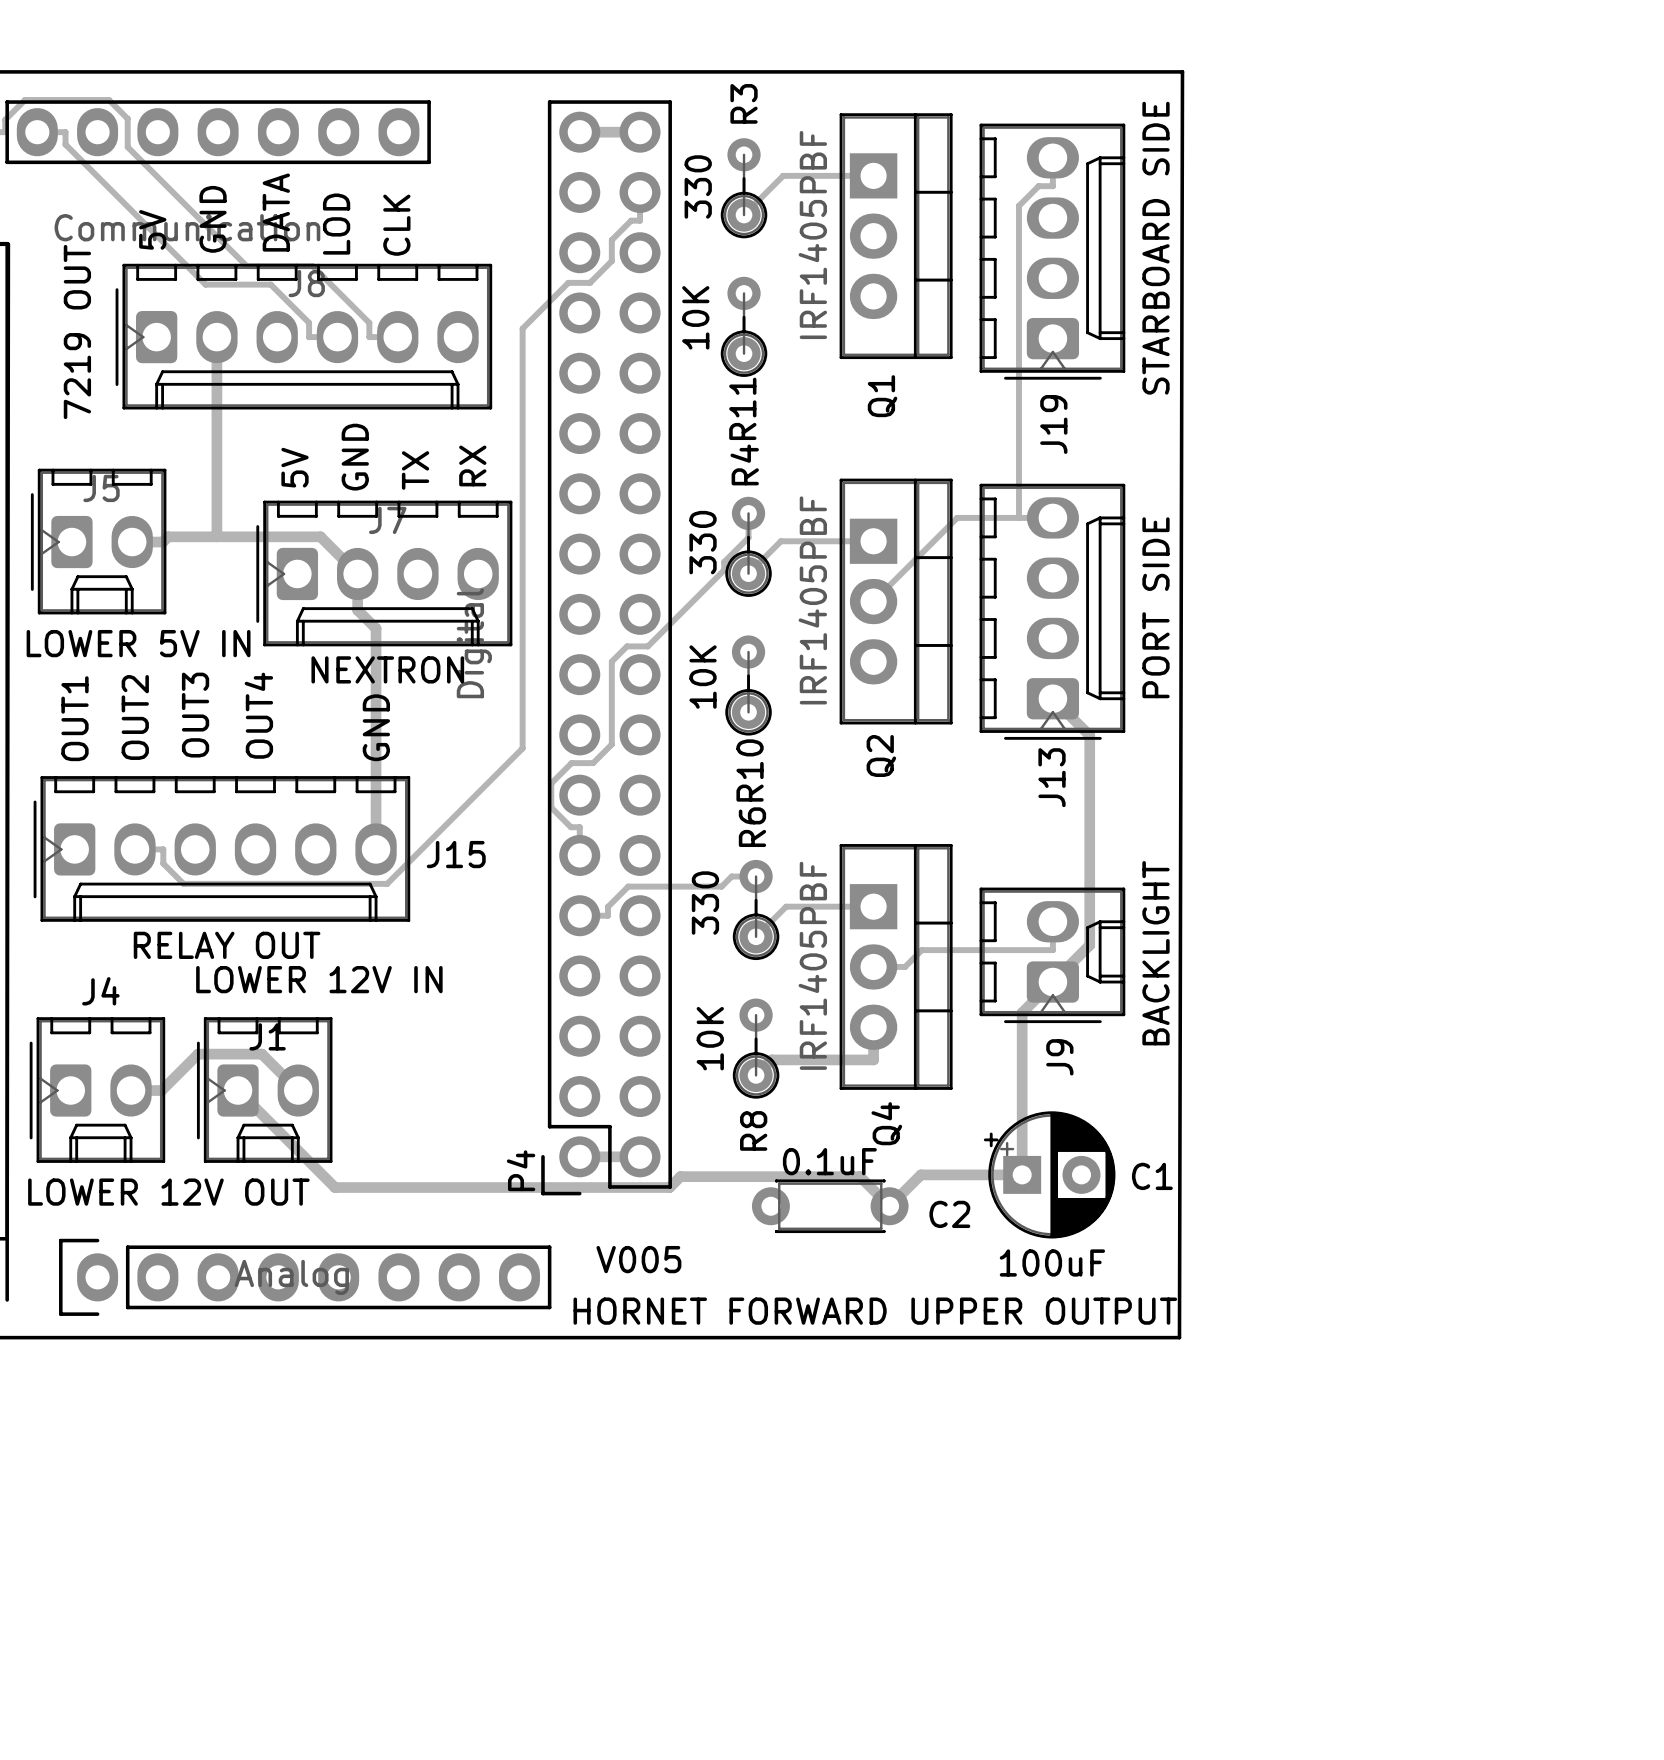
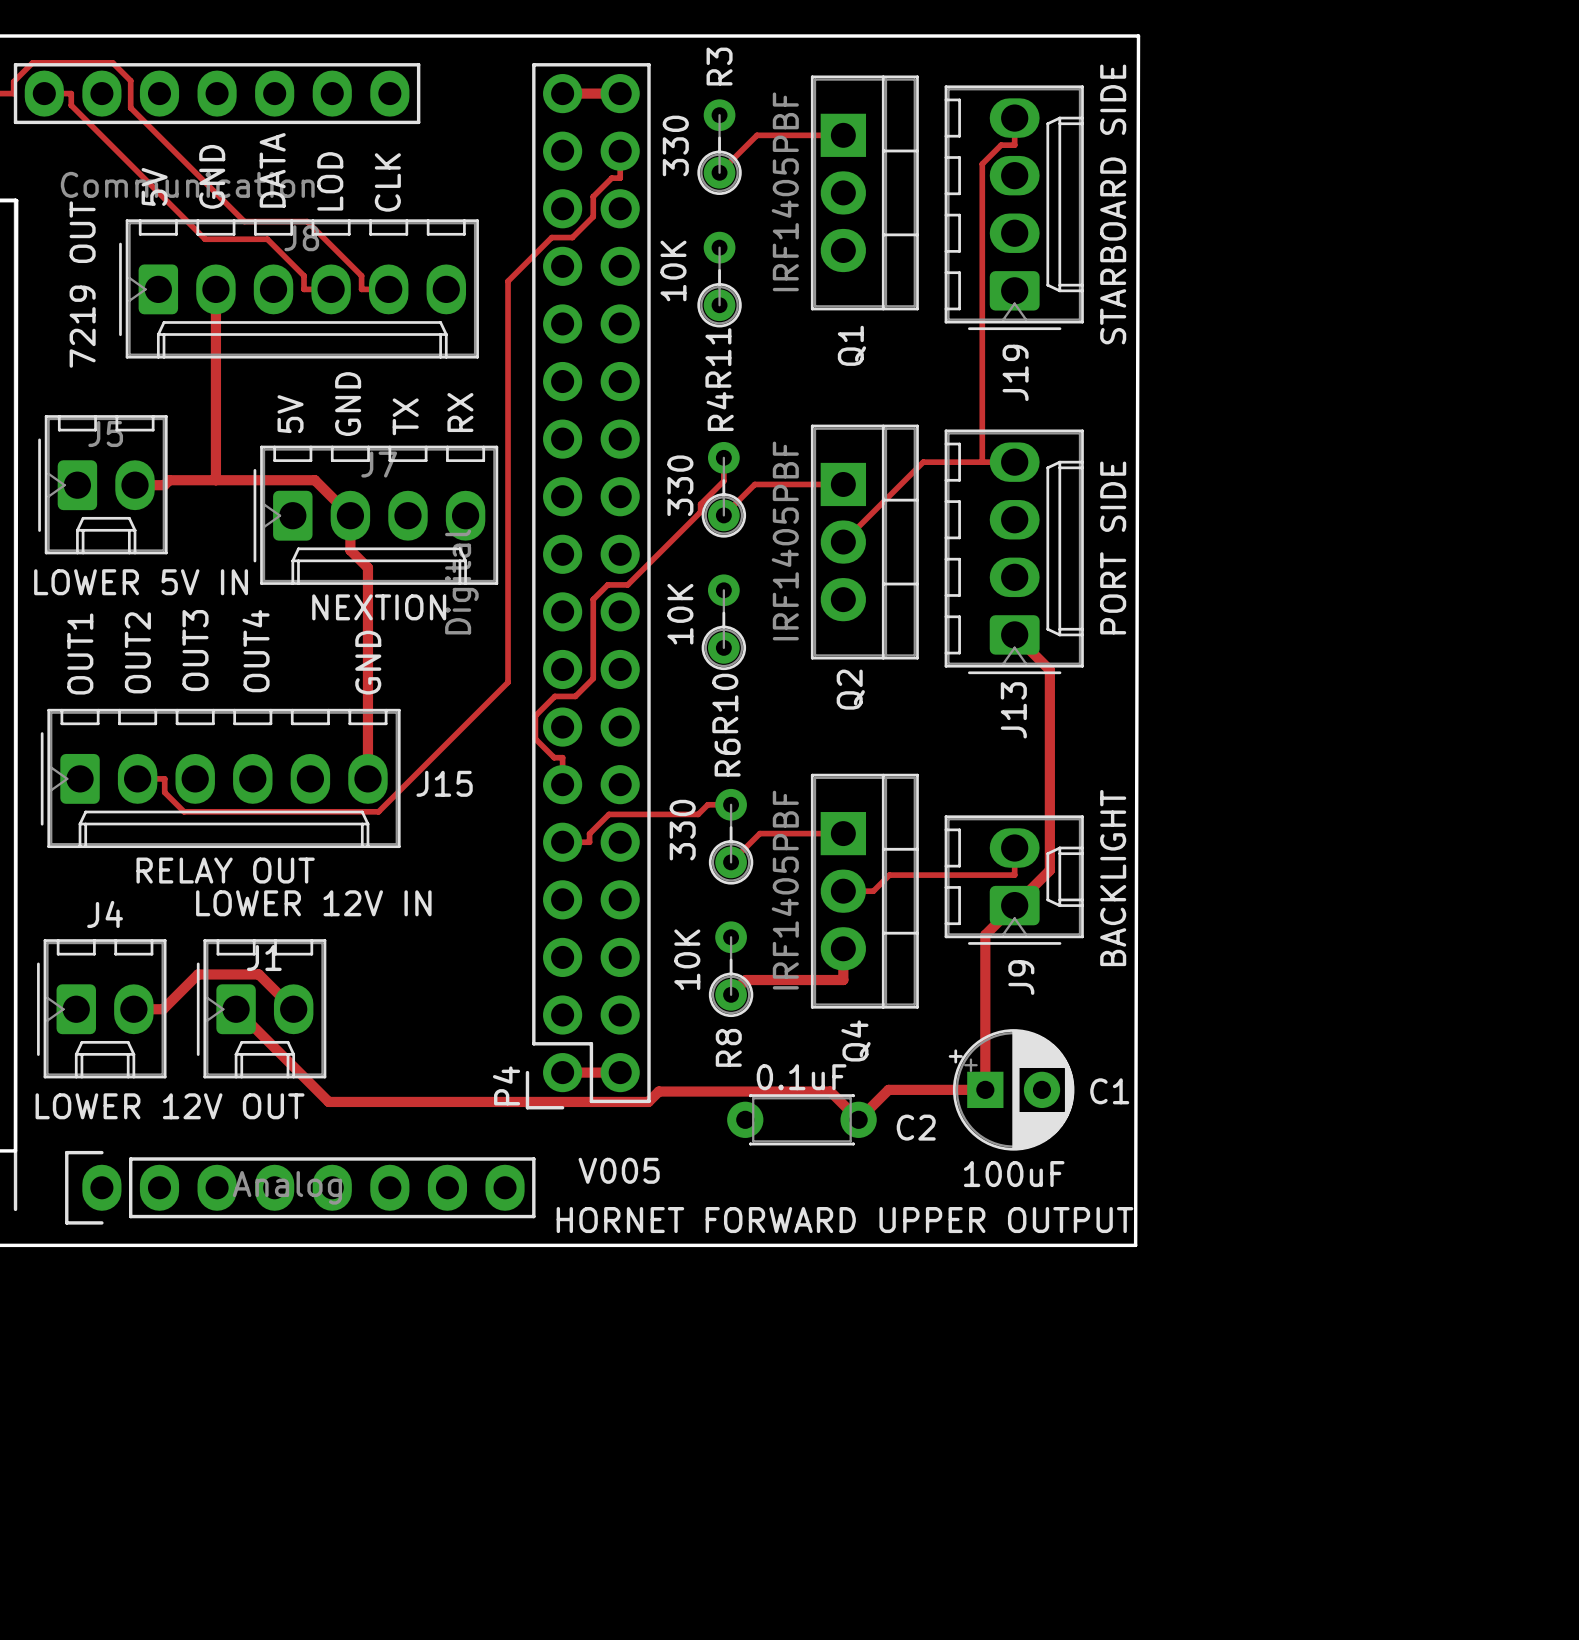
J7 value: NEXTRON (387, 669) -> NEXTION (379, 607)

